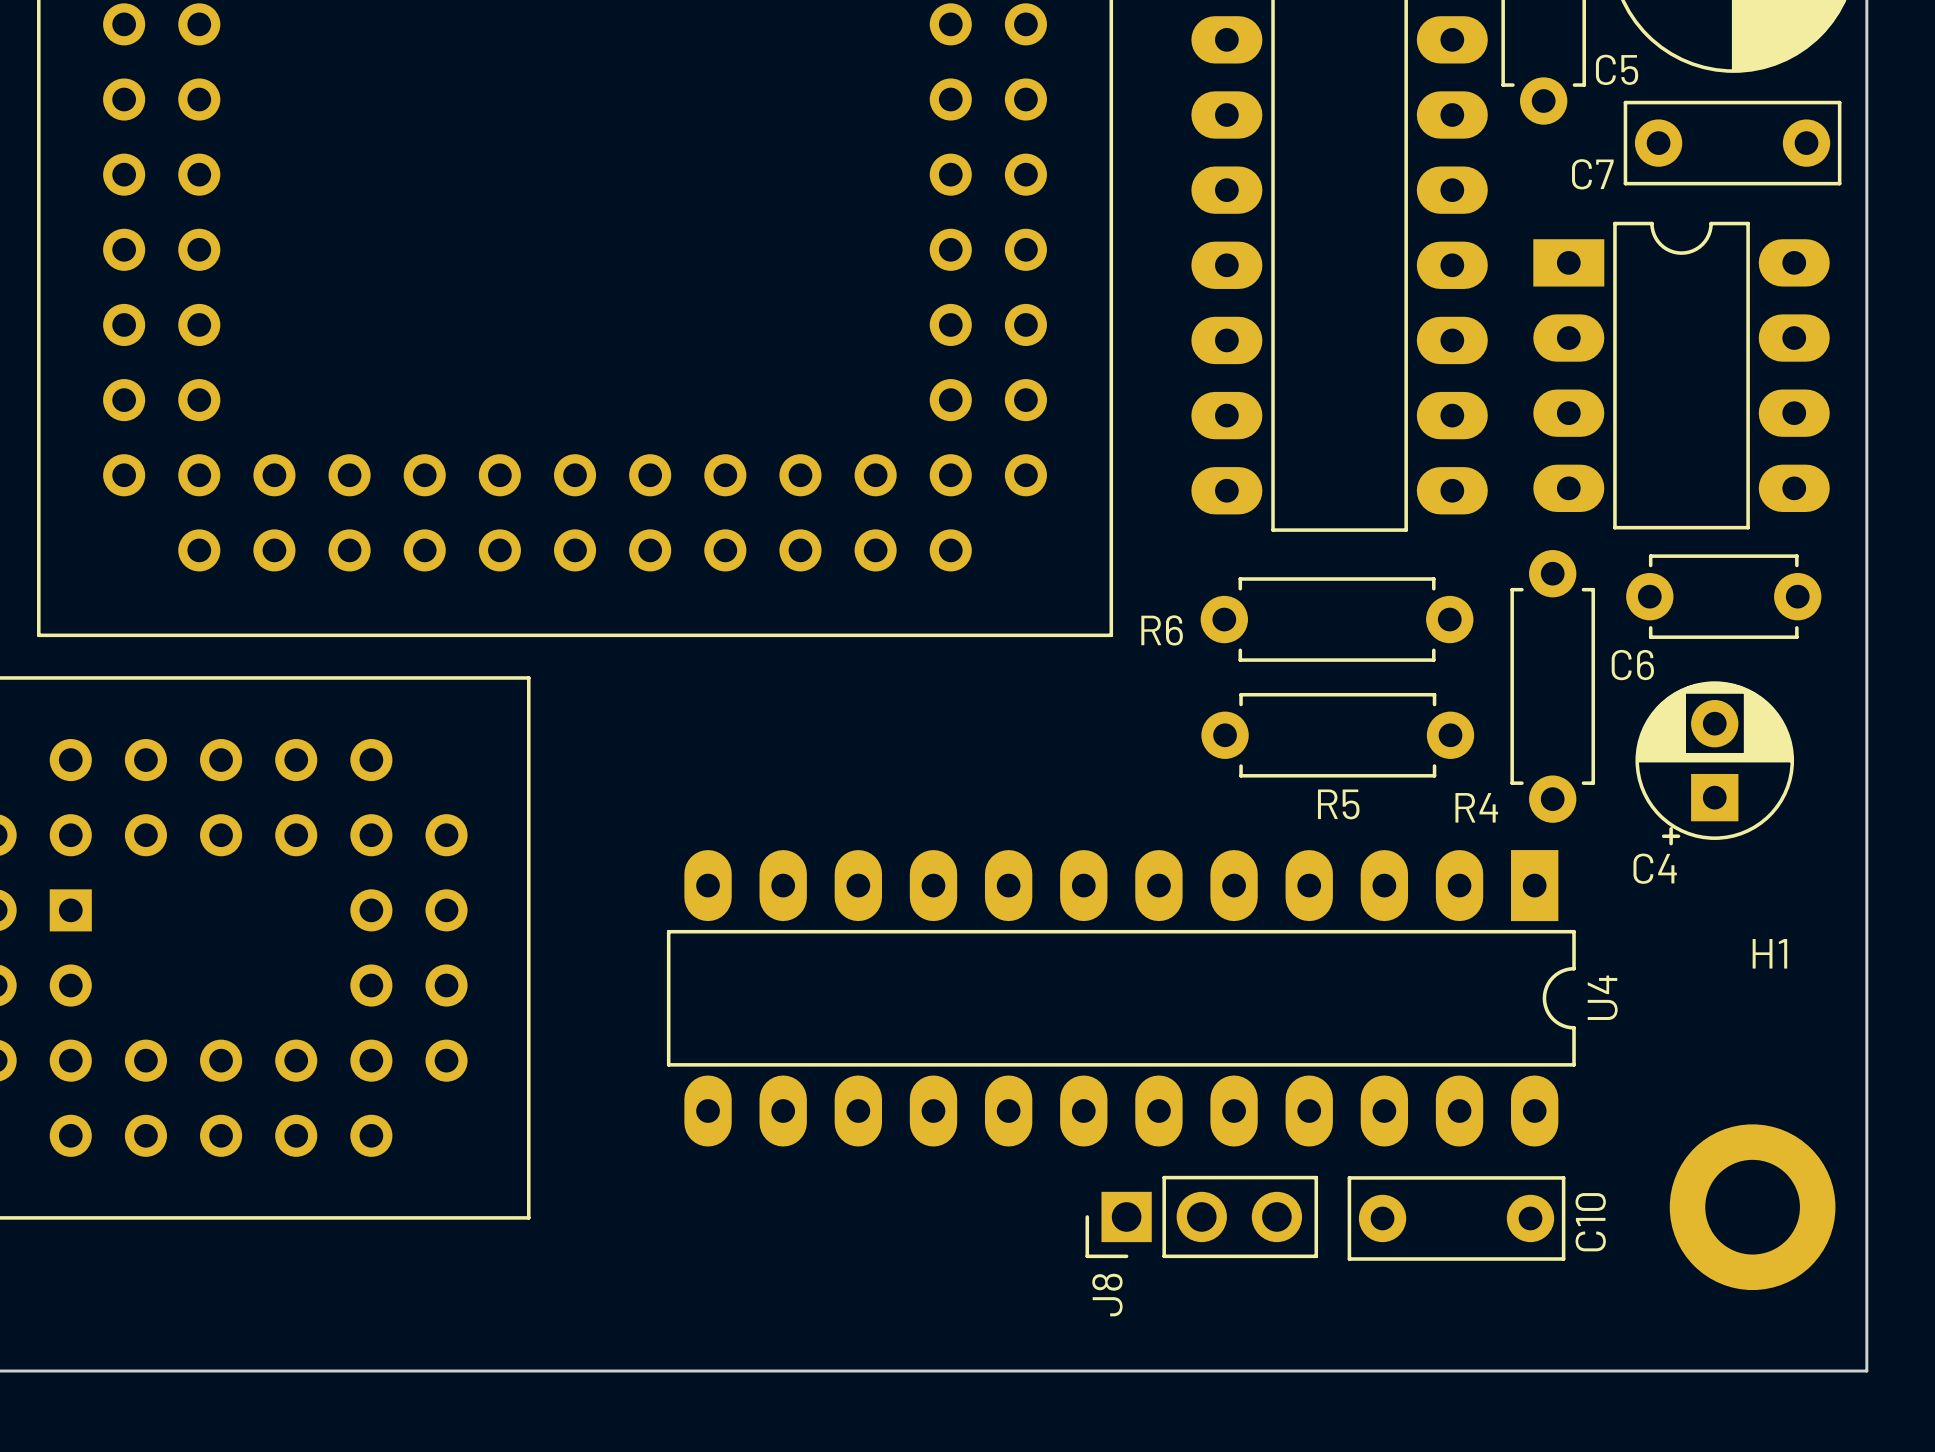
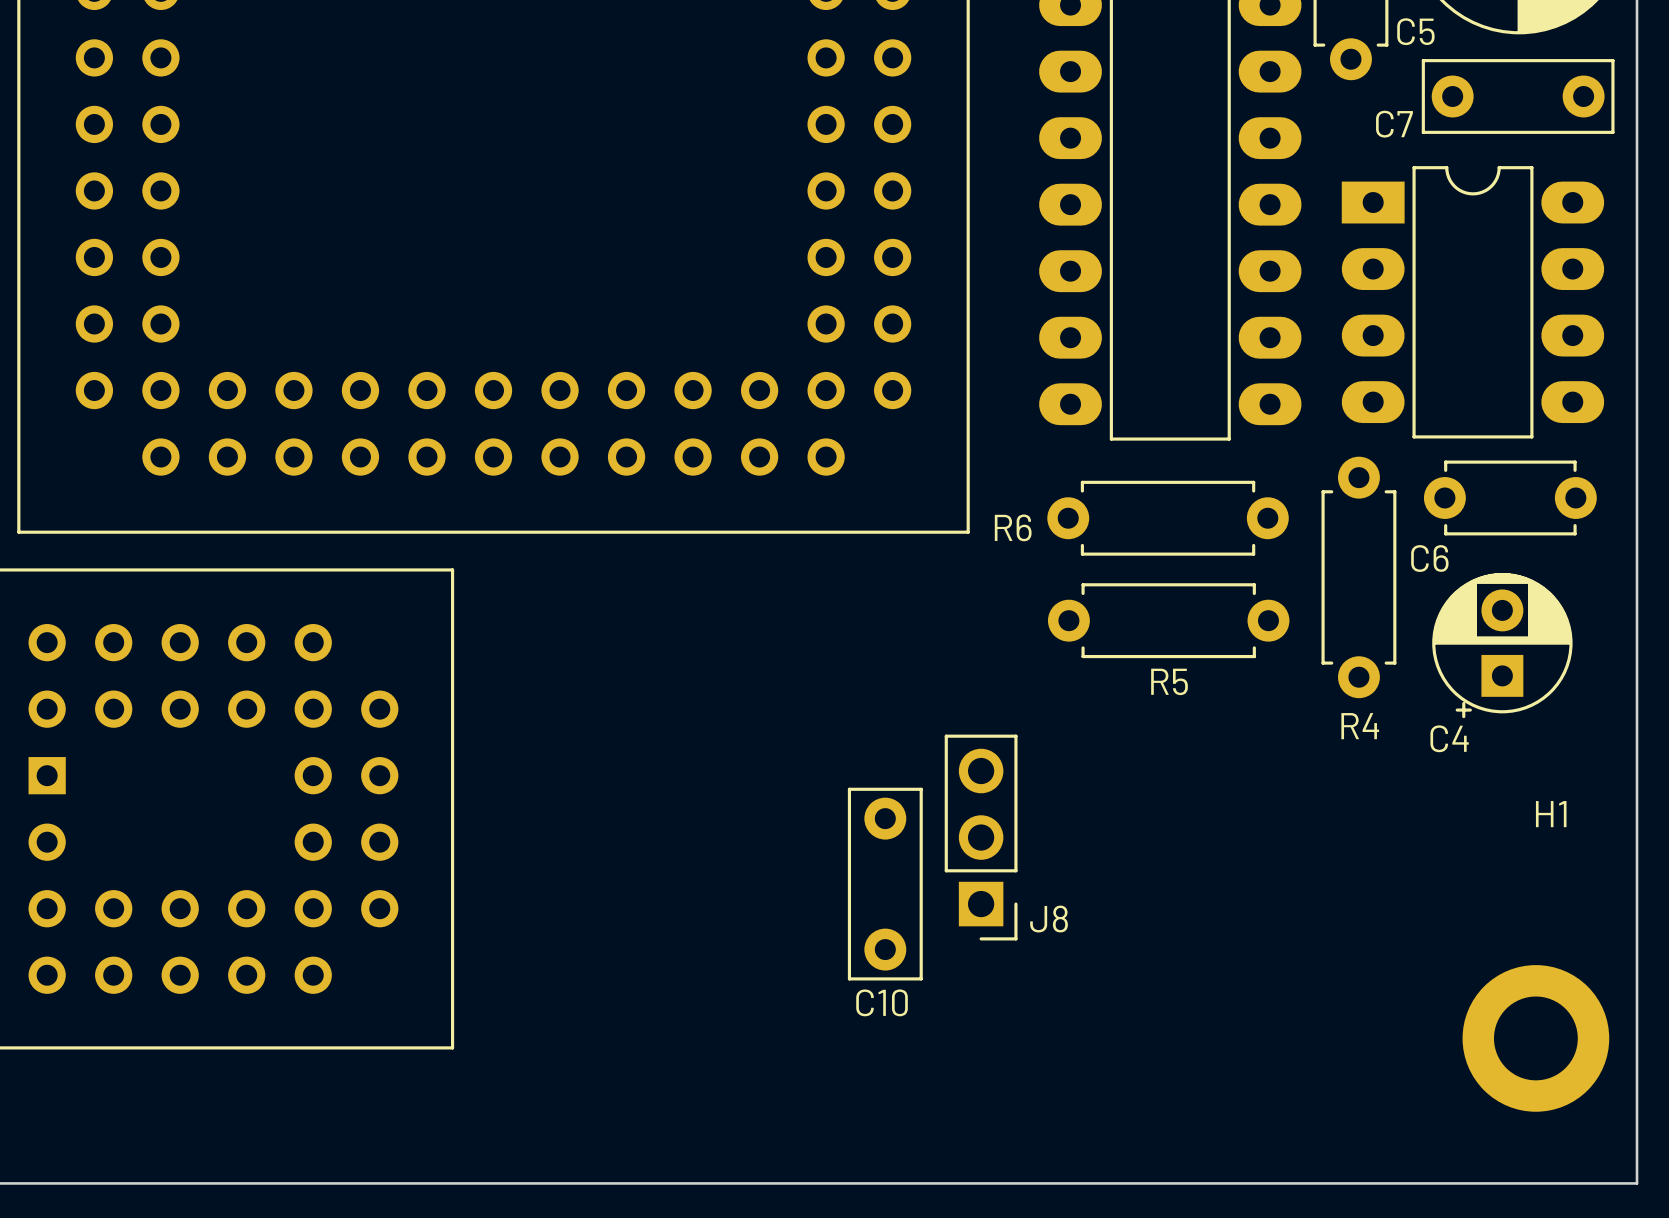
R4 name position: R4 (1476, 807) -> R4 (1360, 726)
U4: (1121, 998) -> none
J8 rotation: 0° (1201, 1216) -> 90° counterclockwise (981, 837)
J8 position: (1201, 1216) -> (981, 837)
C10 rotation: 0° (1456, 1218) -> 90° clockwise (885, 884)
C10 position: (1456, 1218) -> (885, 884)

